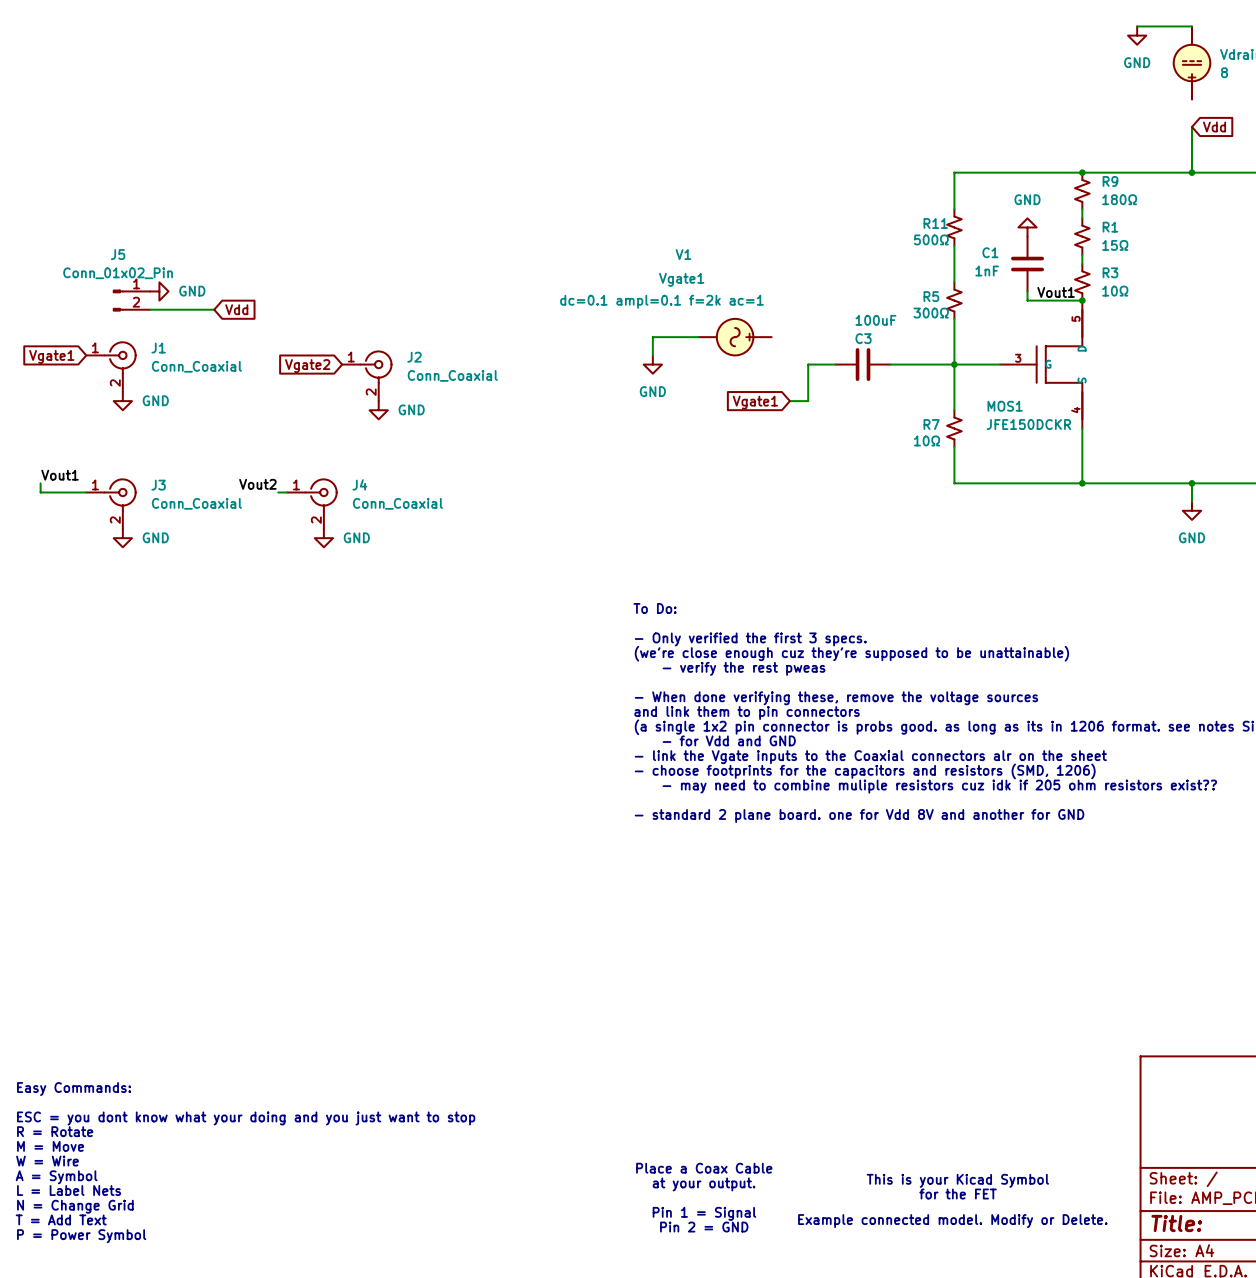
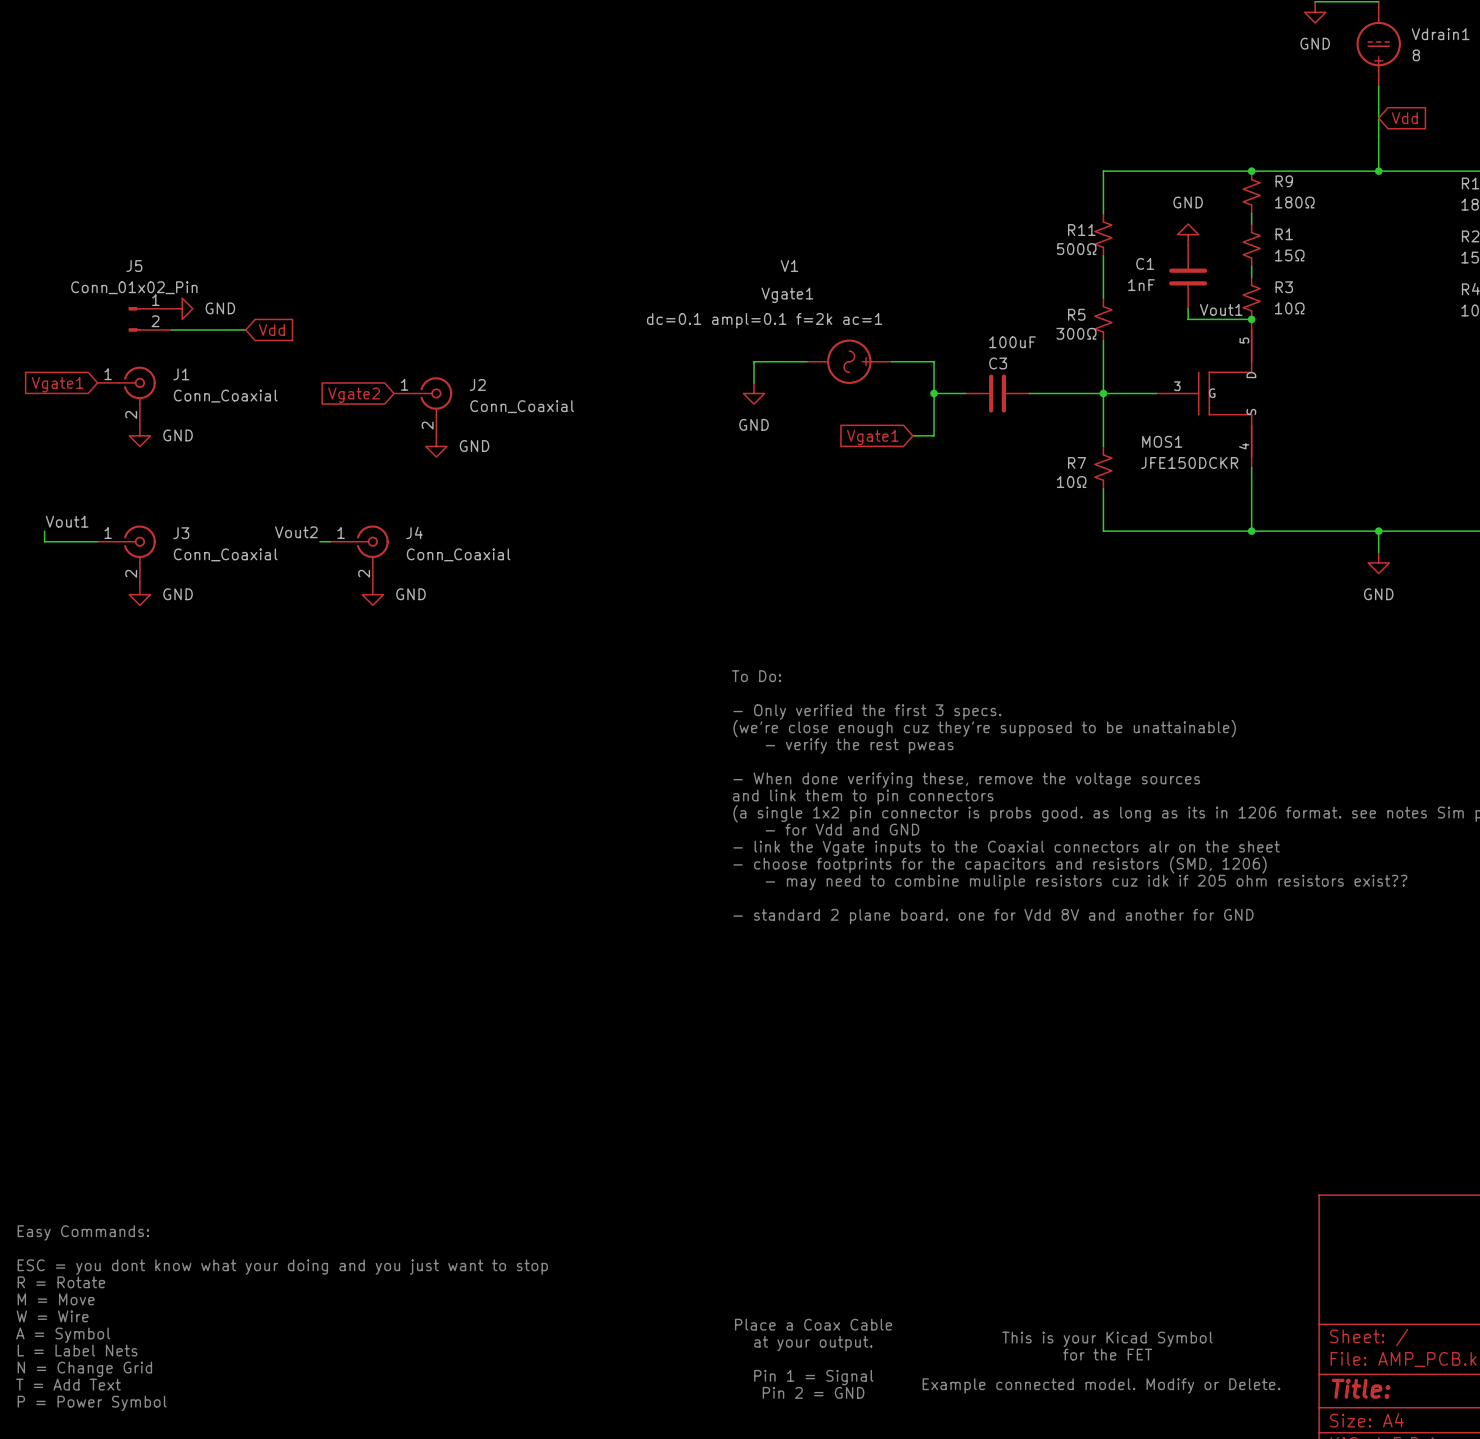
wire: none -> (1378, 86) (1378, 118)
wire: none -> (891, 361) (934, 361) (934, 393)
junction: none -> (934, 393)

